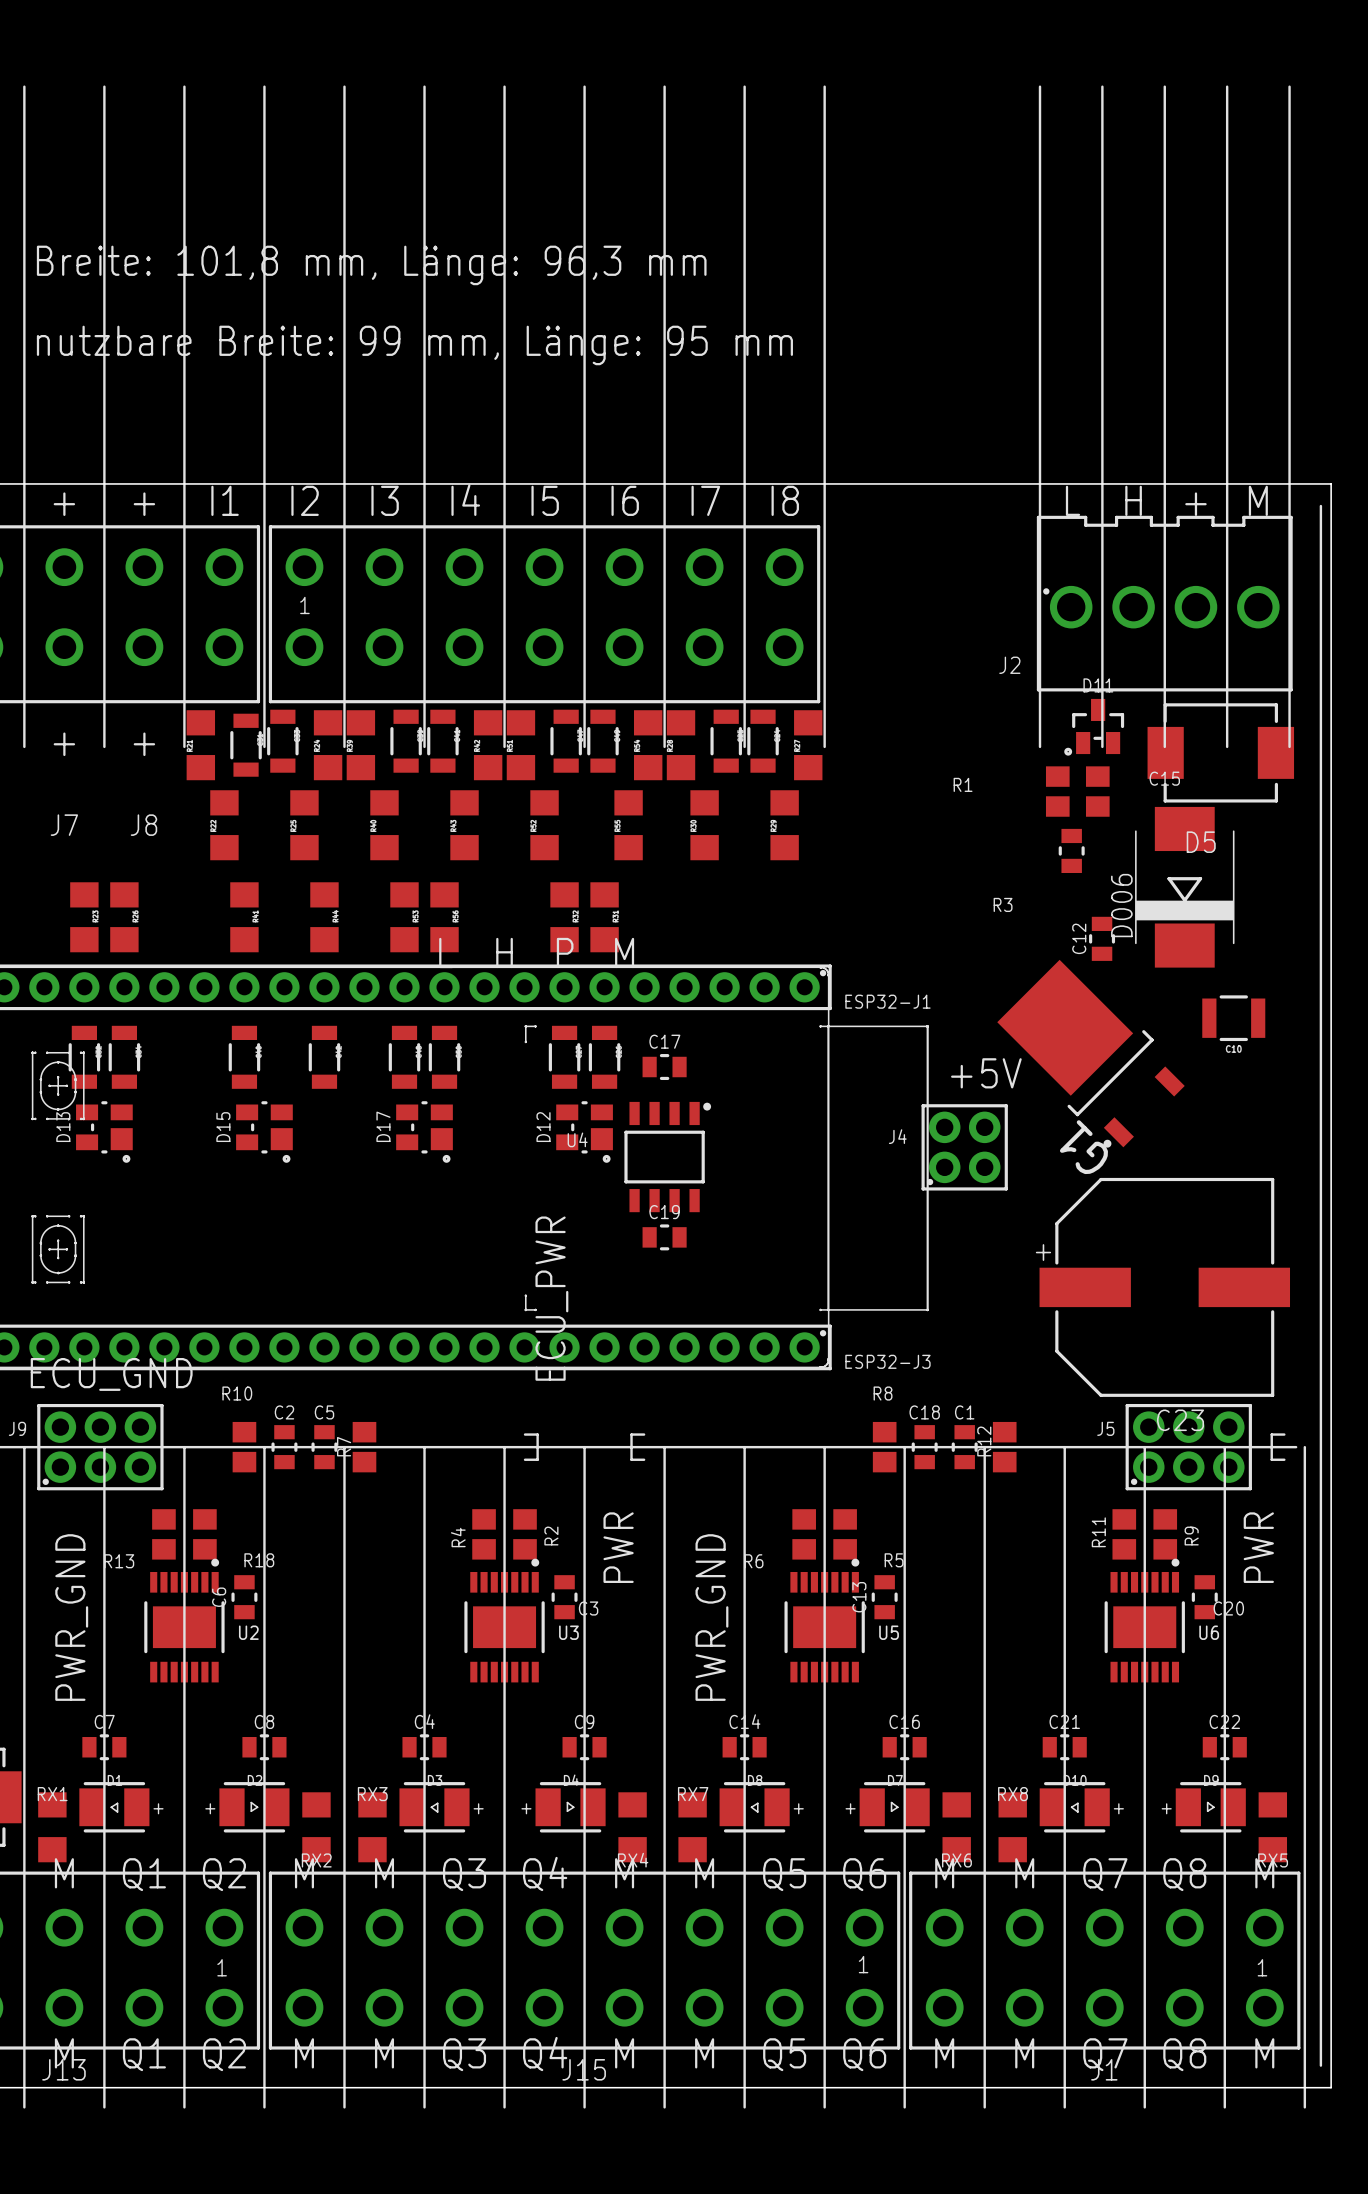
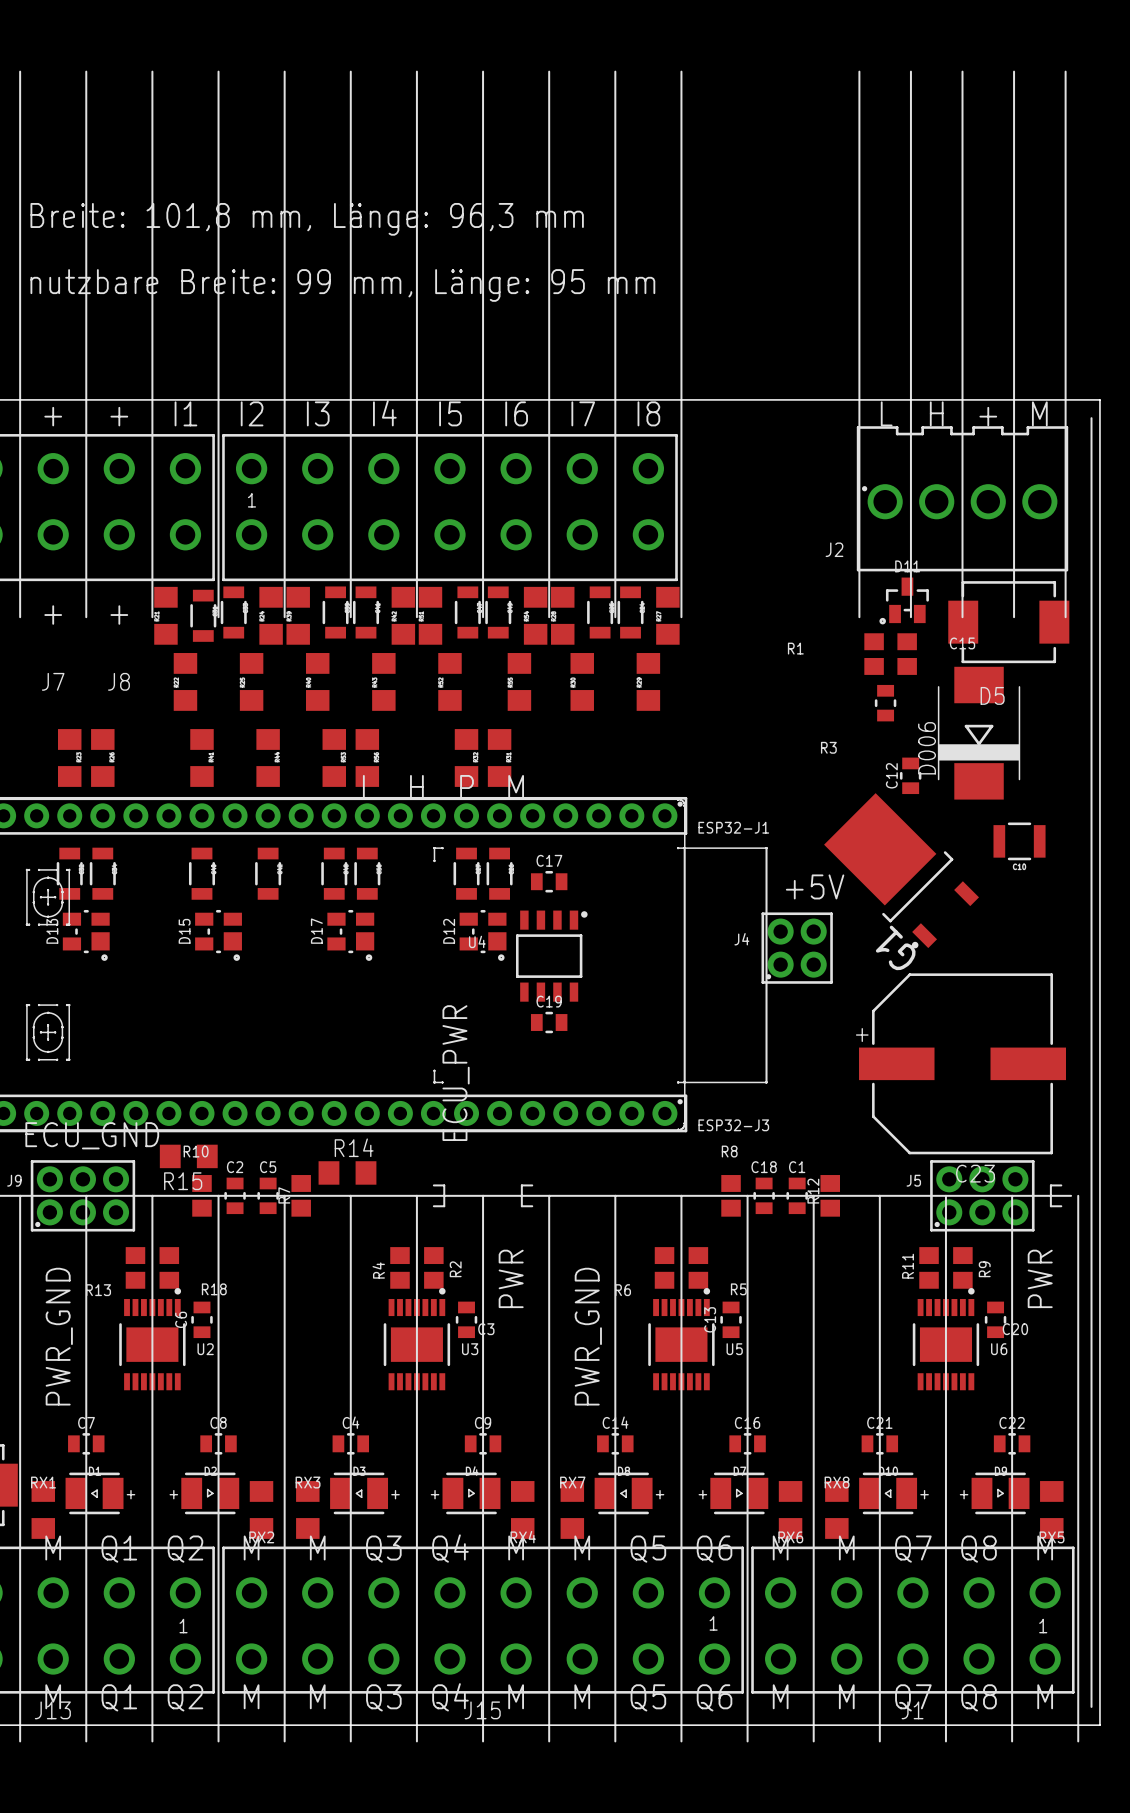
R15: none -> (188, 1156)
R14: none -> (347, 1172)

